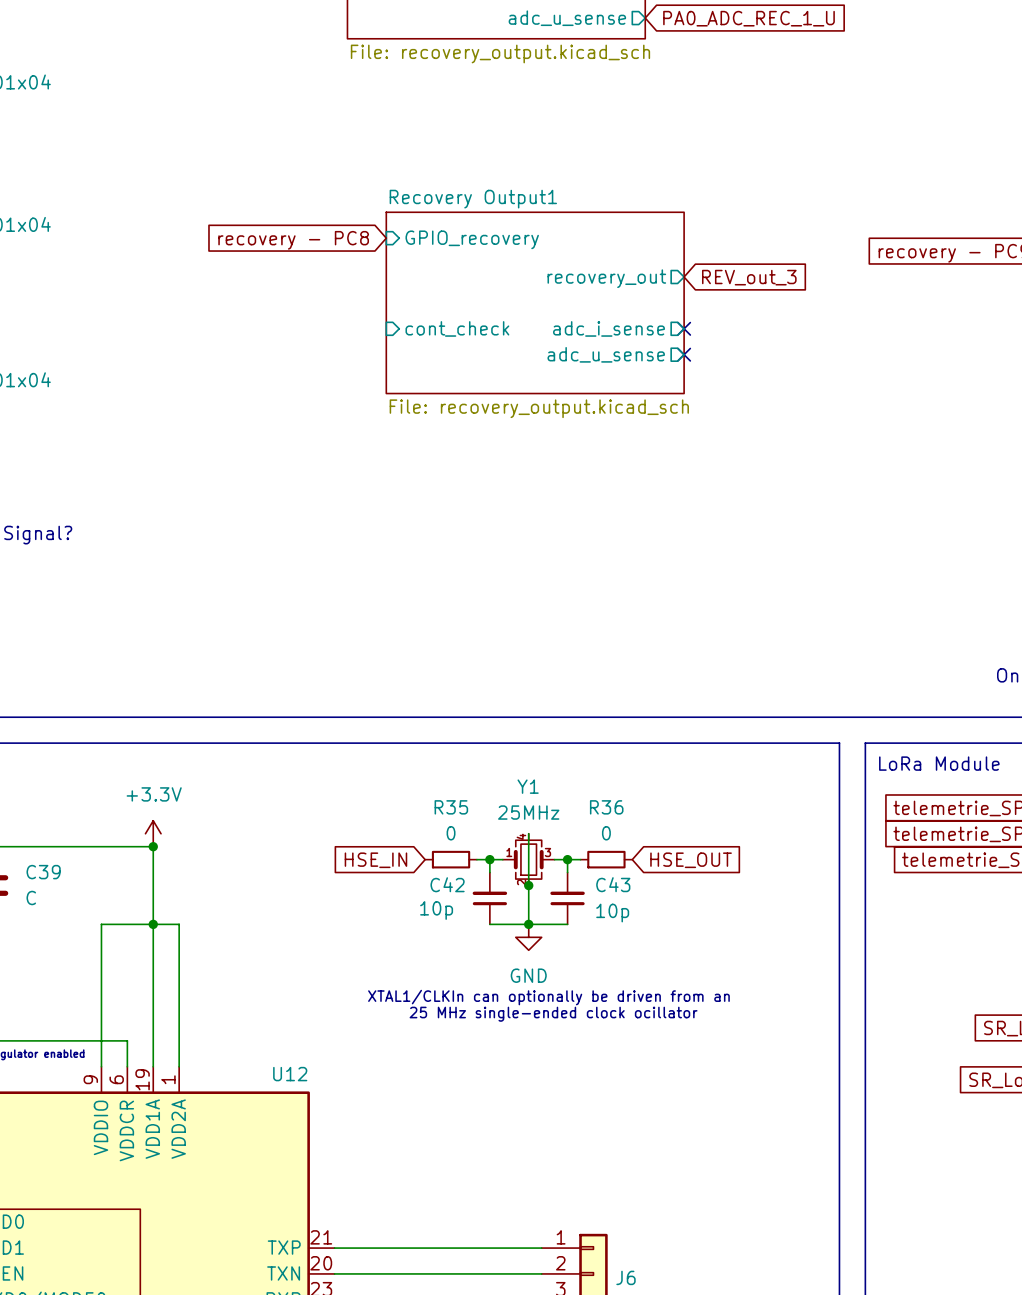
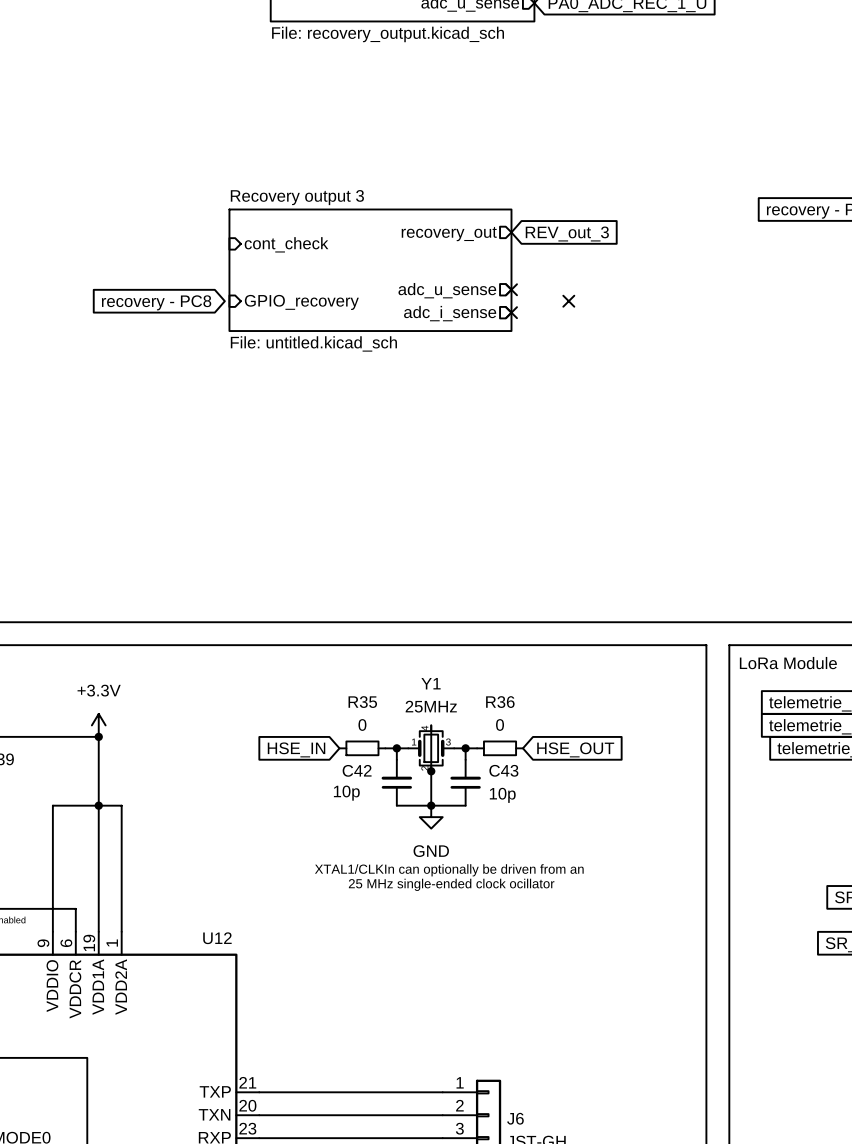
sheet pin position: GPIO_recovery (472, 239) -> GPIO_recovery (301, 302)
global label position: recovery - PC8 (293, 240) -> recovery - PC8 (156, 302)
global label position: REV_out_3 (749, 277) -> REV_out_3 (567, 233)
sheet pin position: recovery_out (606, 278) -> recovery_out (449, 234)
sheet Recovery Output1: File: recovery_output.kicad_sch (535, 302) -> none
sheet Recovery output 3: none -> File: untitled.kicad_sch (370, 270)
sheet pin position: cont_check (457, 328) -> cont_check (286, 244)
sheet pin position: adc_i_sense (608, 328) -> adc_i_sense (450, 313)
no-connect mark: (684, 328) -> none
no-connect mark: none -> (511, 289)
sheet pin position: adc_u_sense (606, 354) -> adc_u_sense (447, 290)
no-connect mark: none -> (511, 312)

